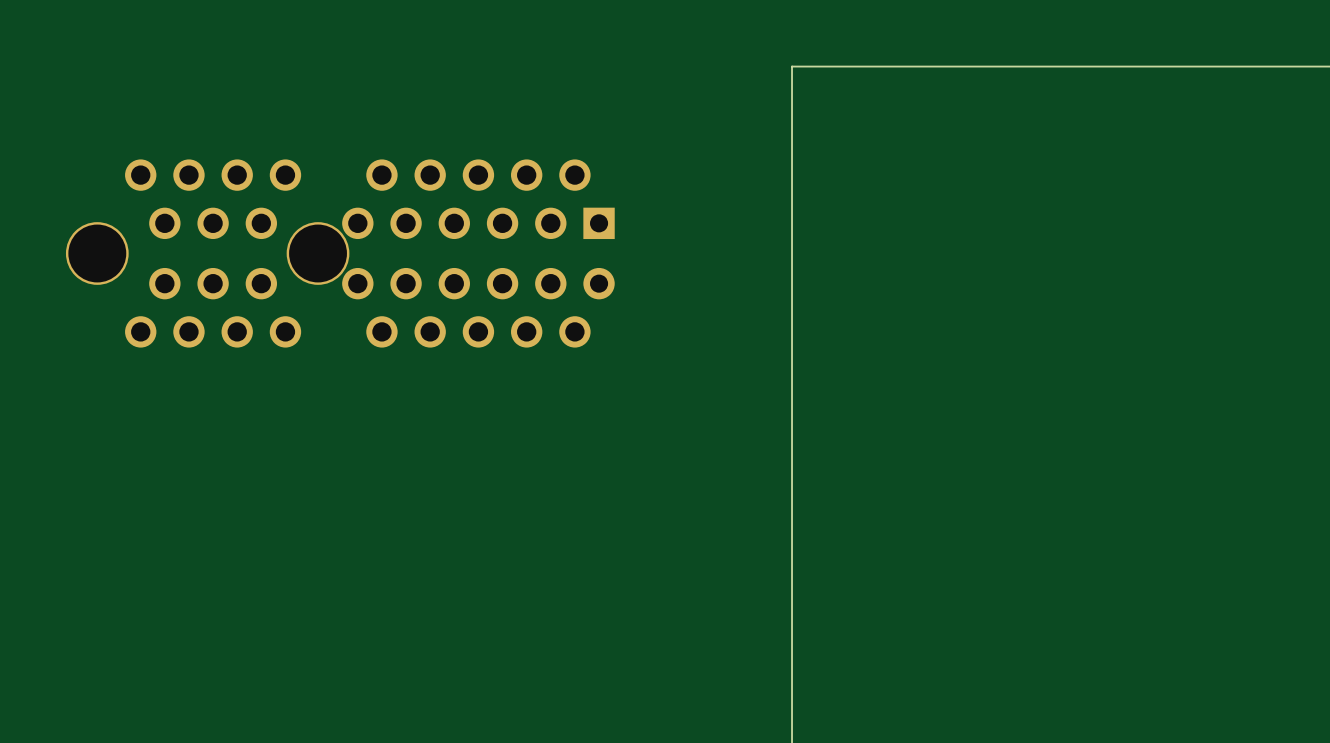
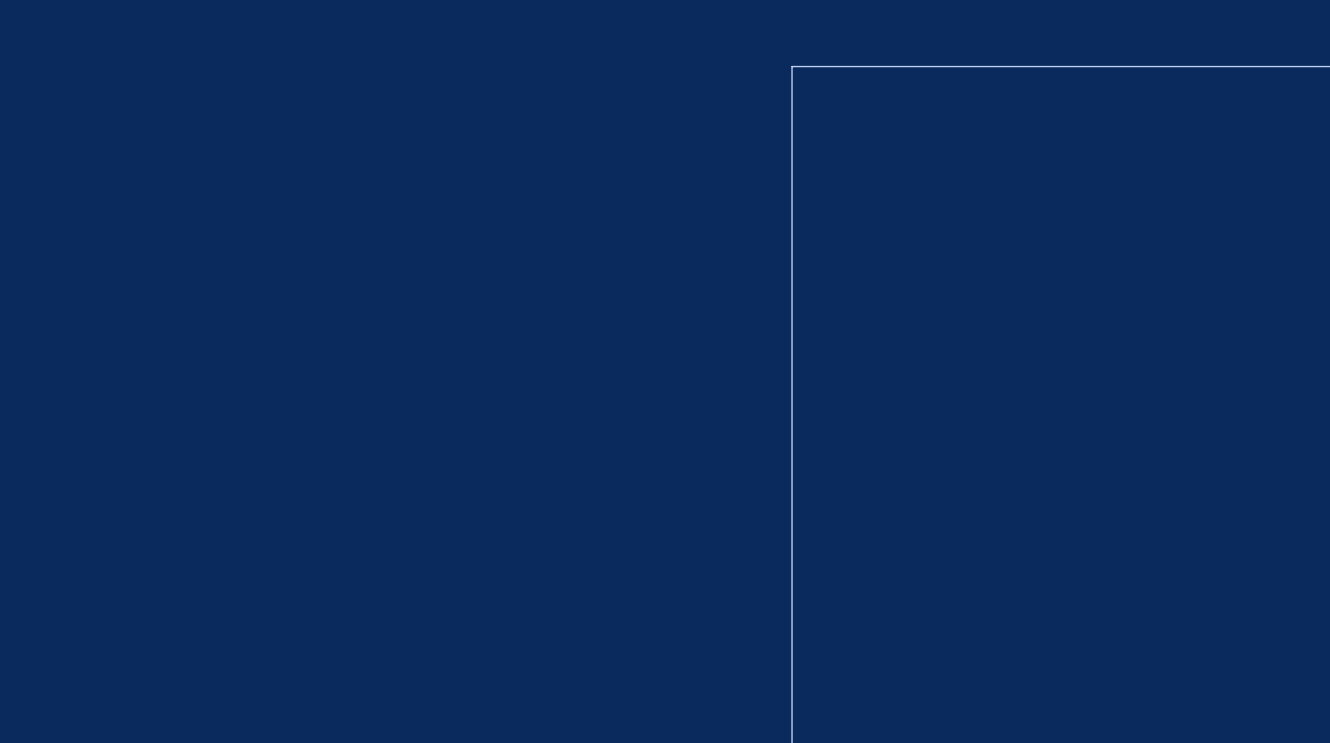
part: (340, 253) -> none

